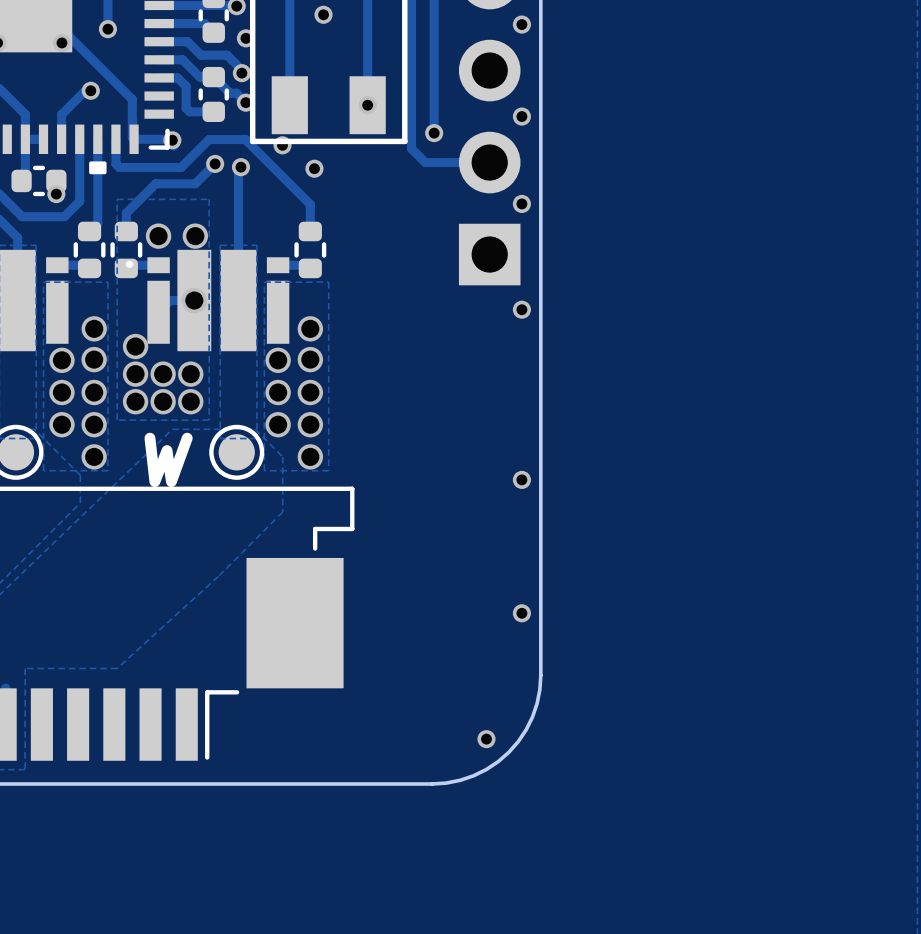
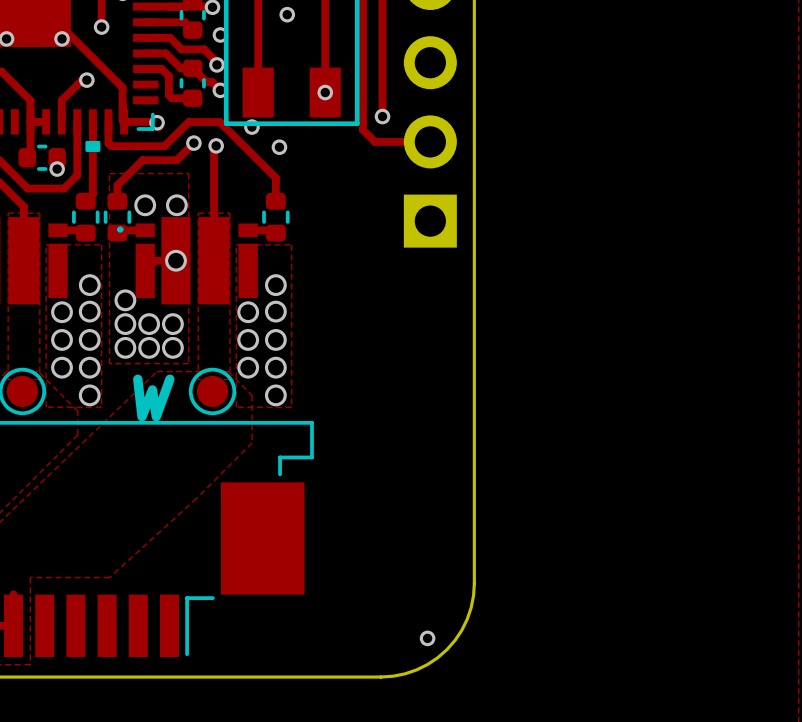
via: (521, 24) -> none
via: (521, 116) -> none
via: (521, 203) -> none
via: (521, 309) -> none
via: (521, 479) -> none
via: (521, 613) -> none

